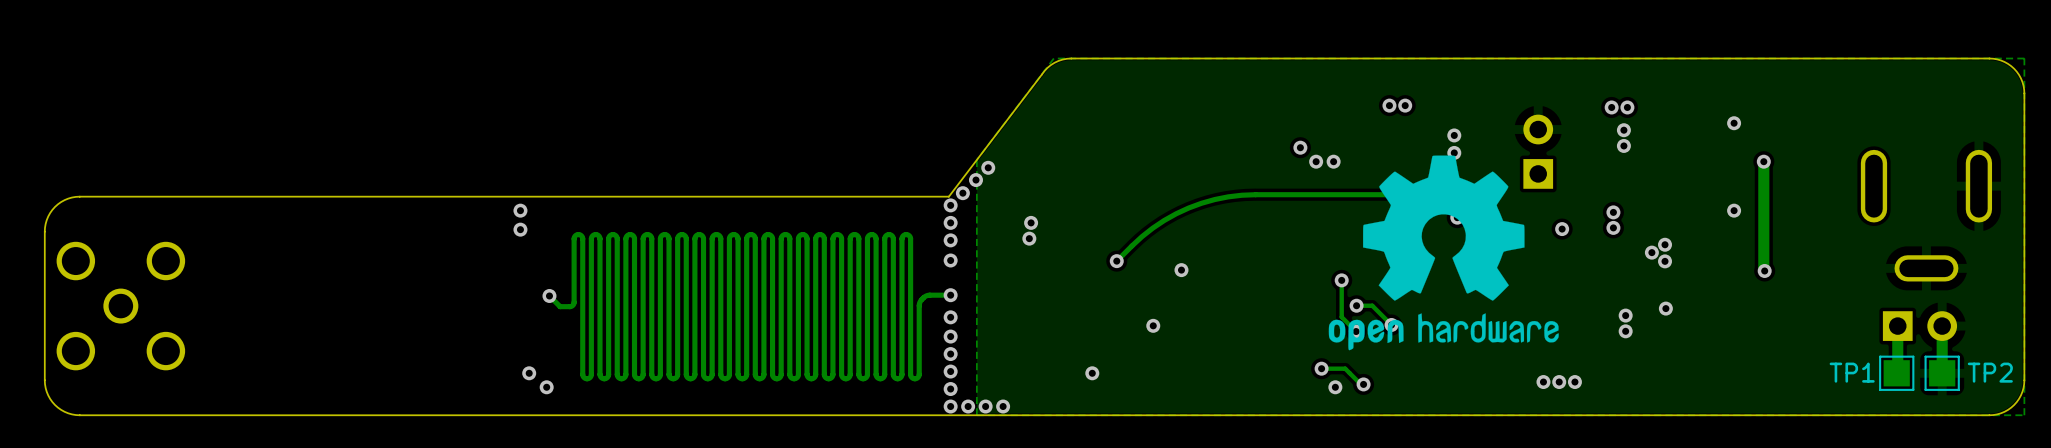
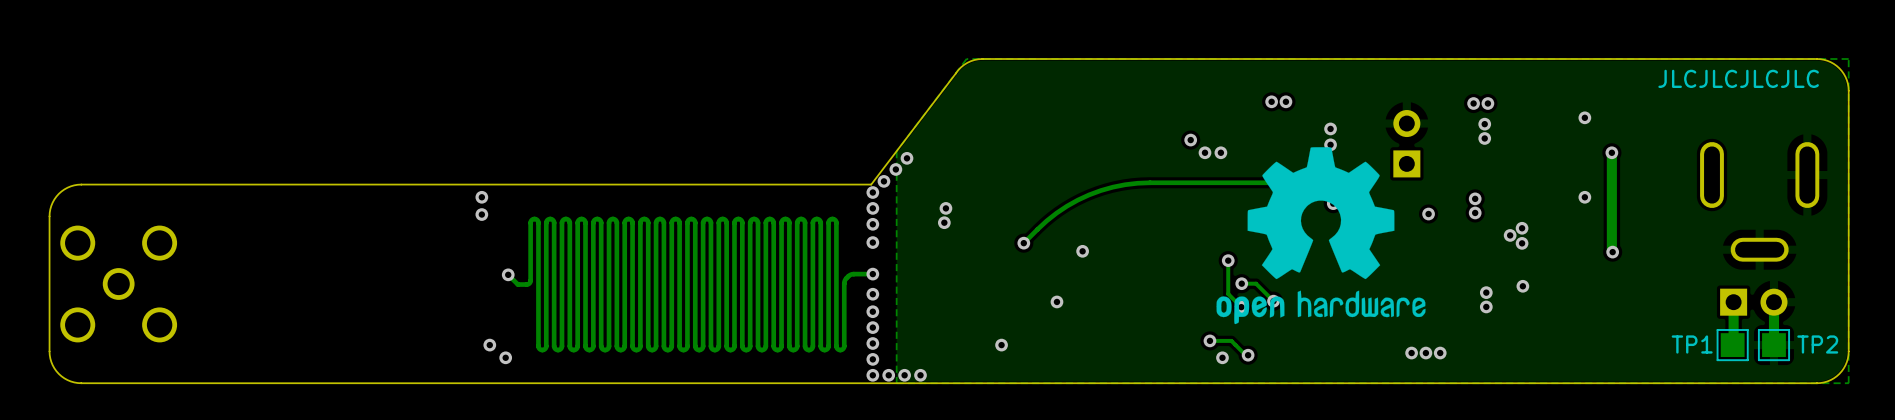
text: none -> JLCJLCJLCJLC (1738, 78)

